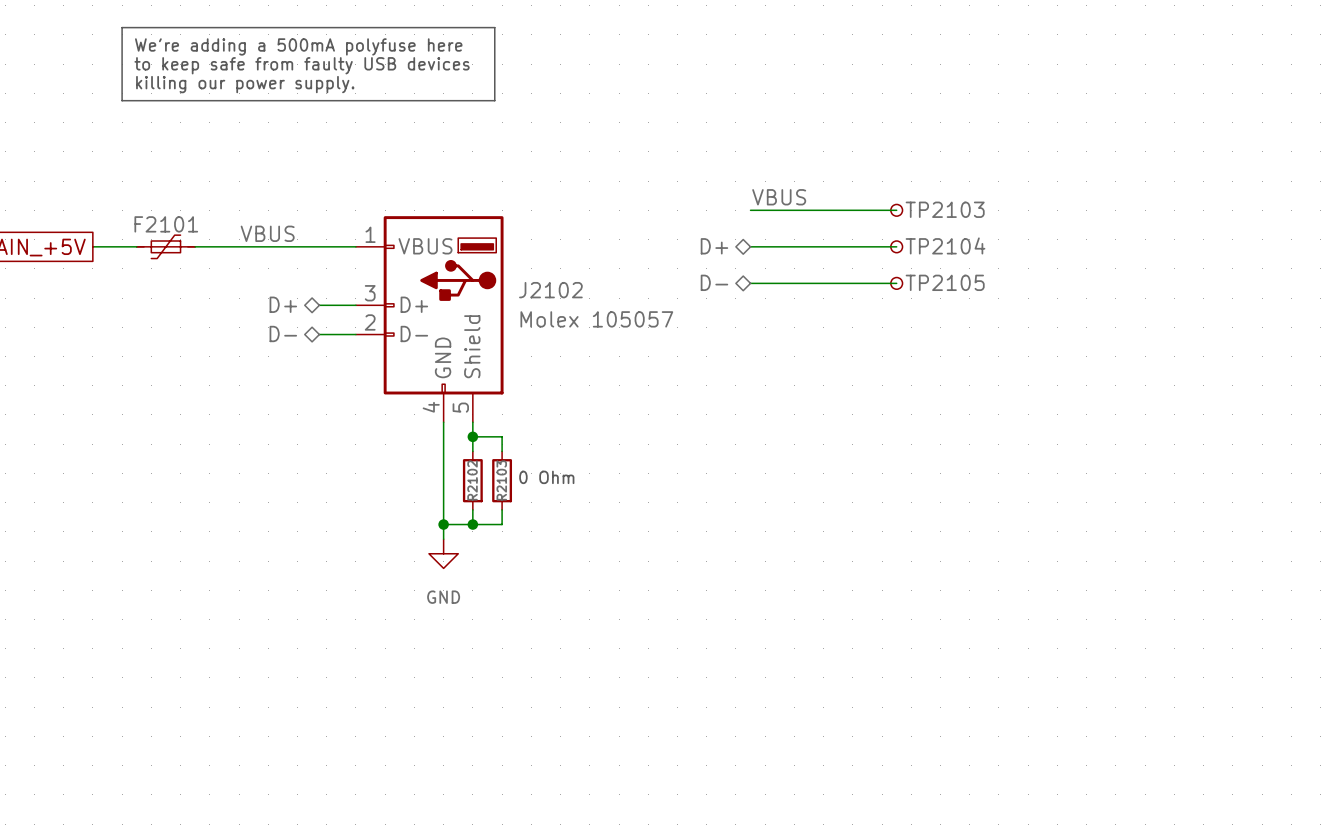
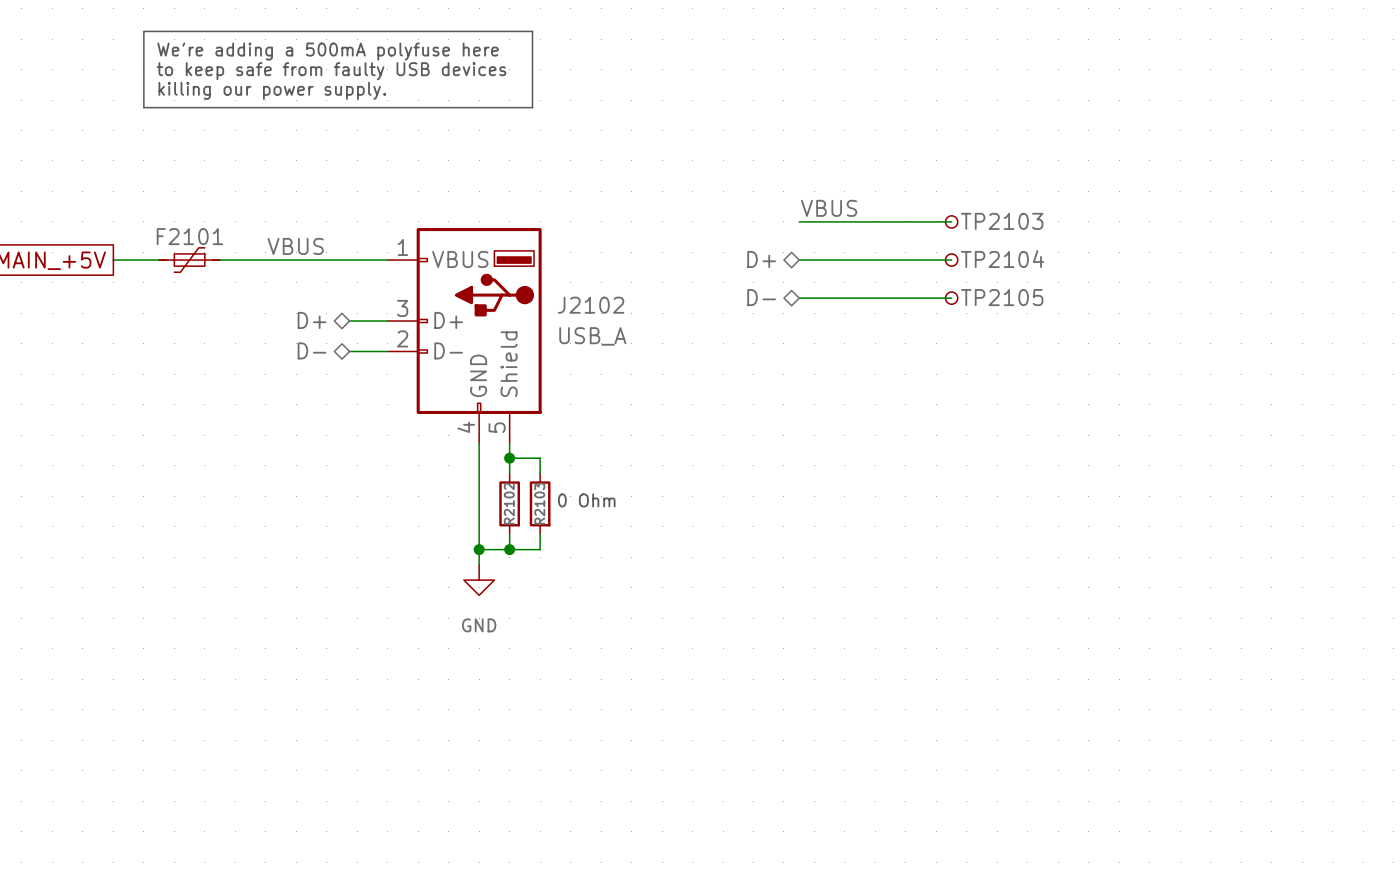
J2102 value: Molex 105057 (596, 319) -> USB_A (592, 336)

